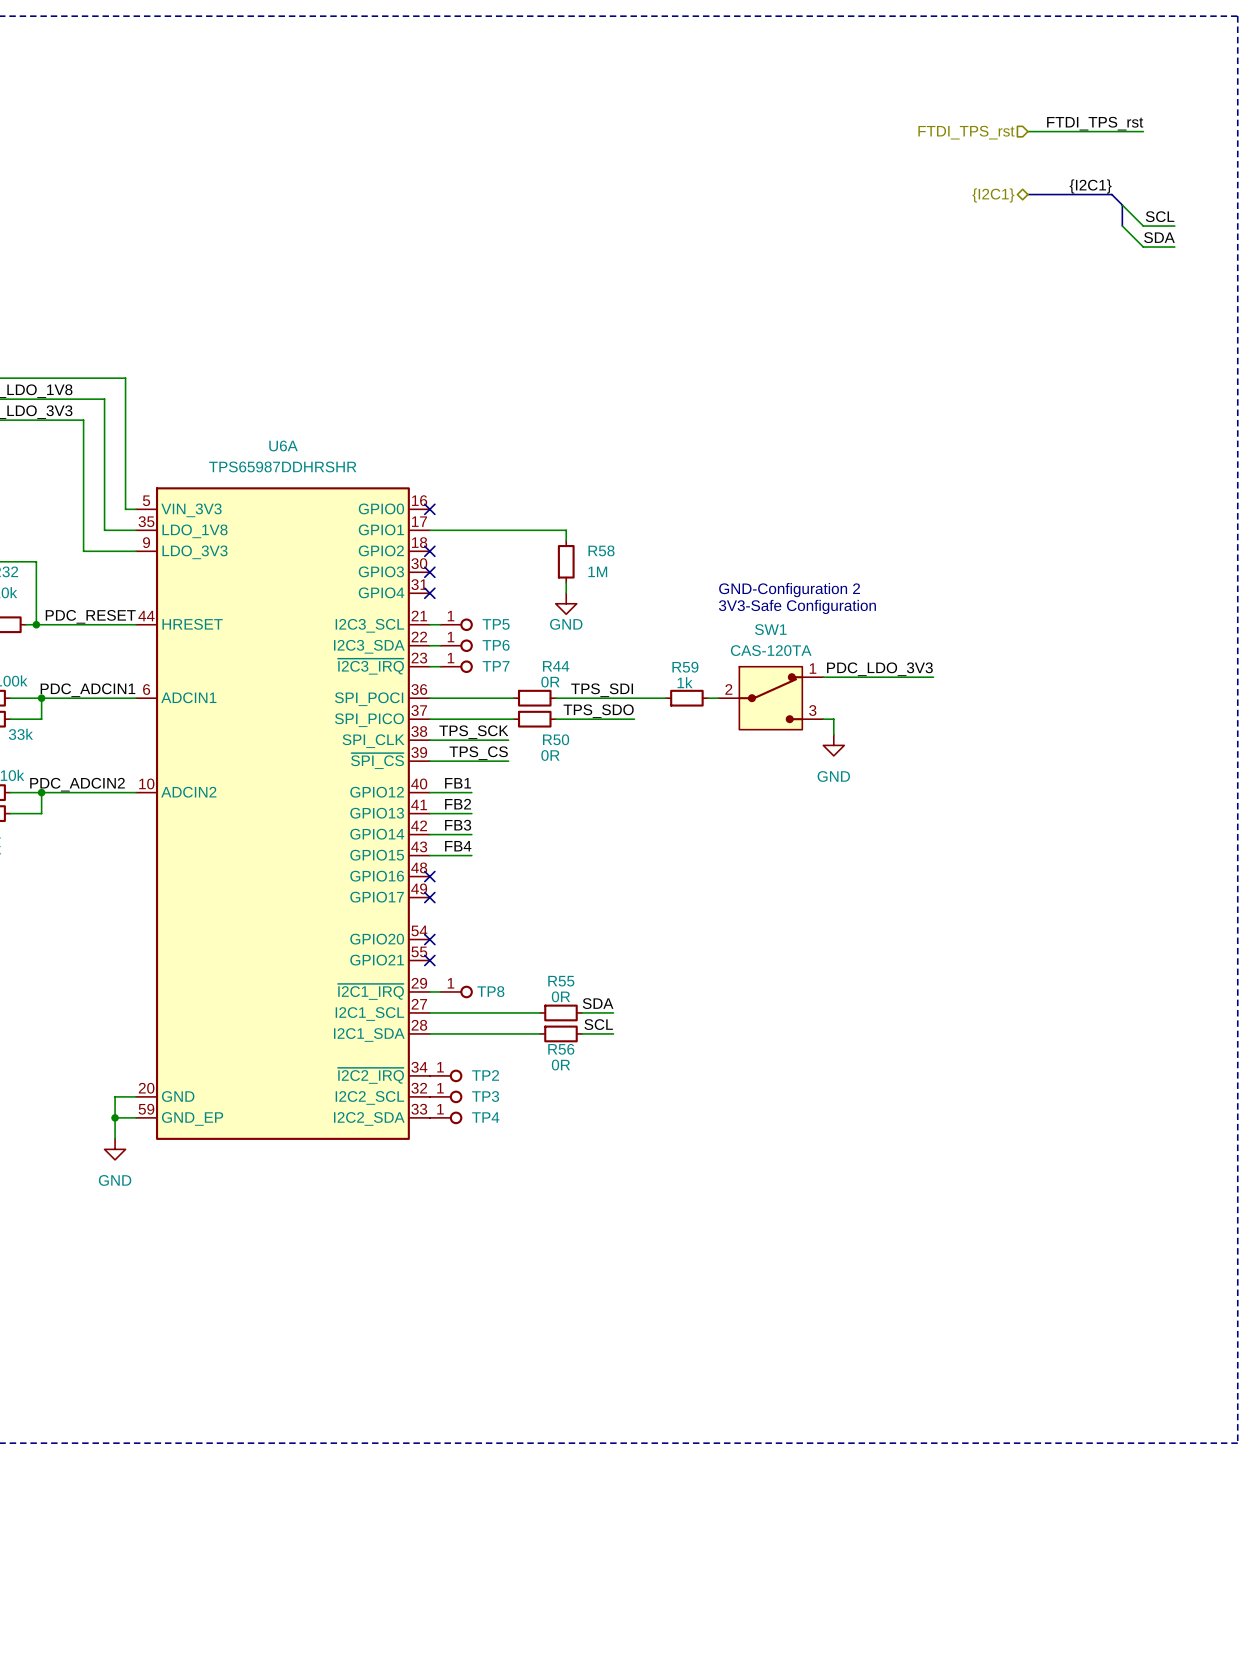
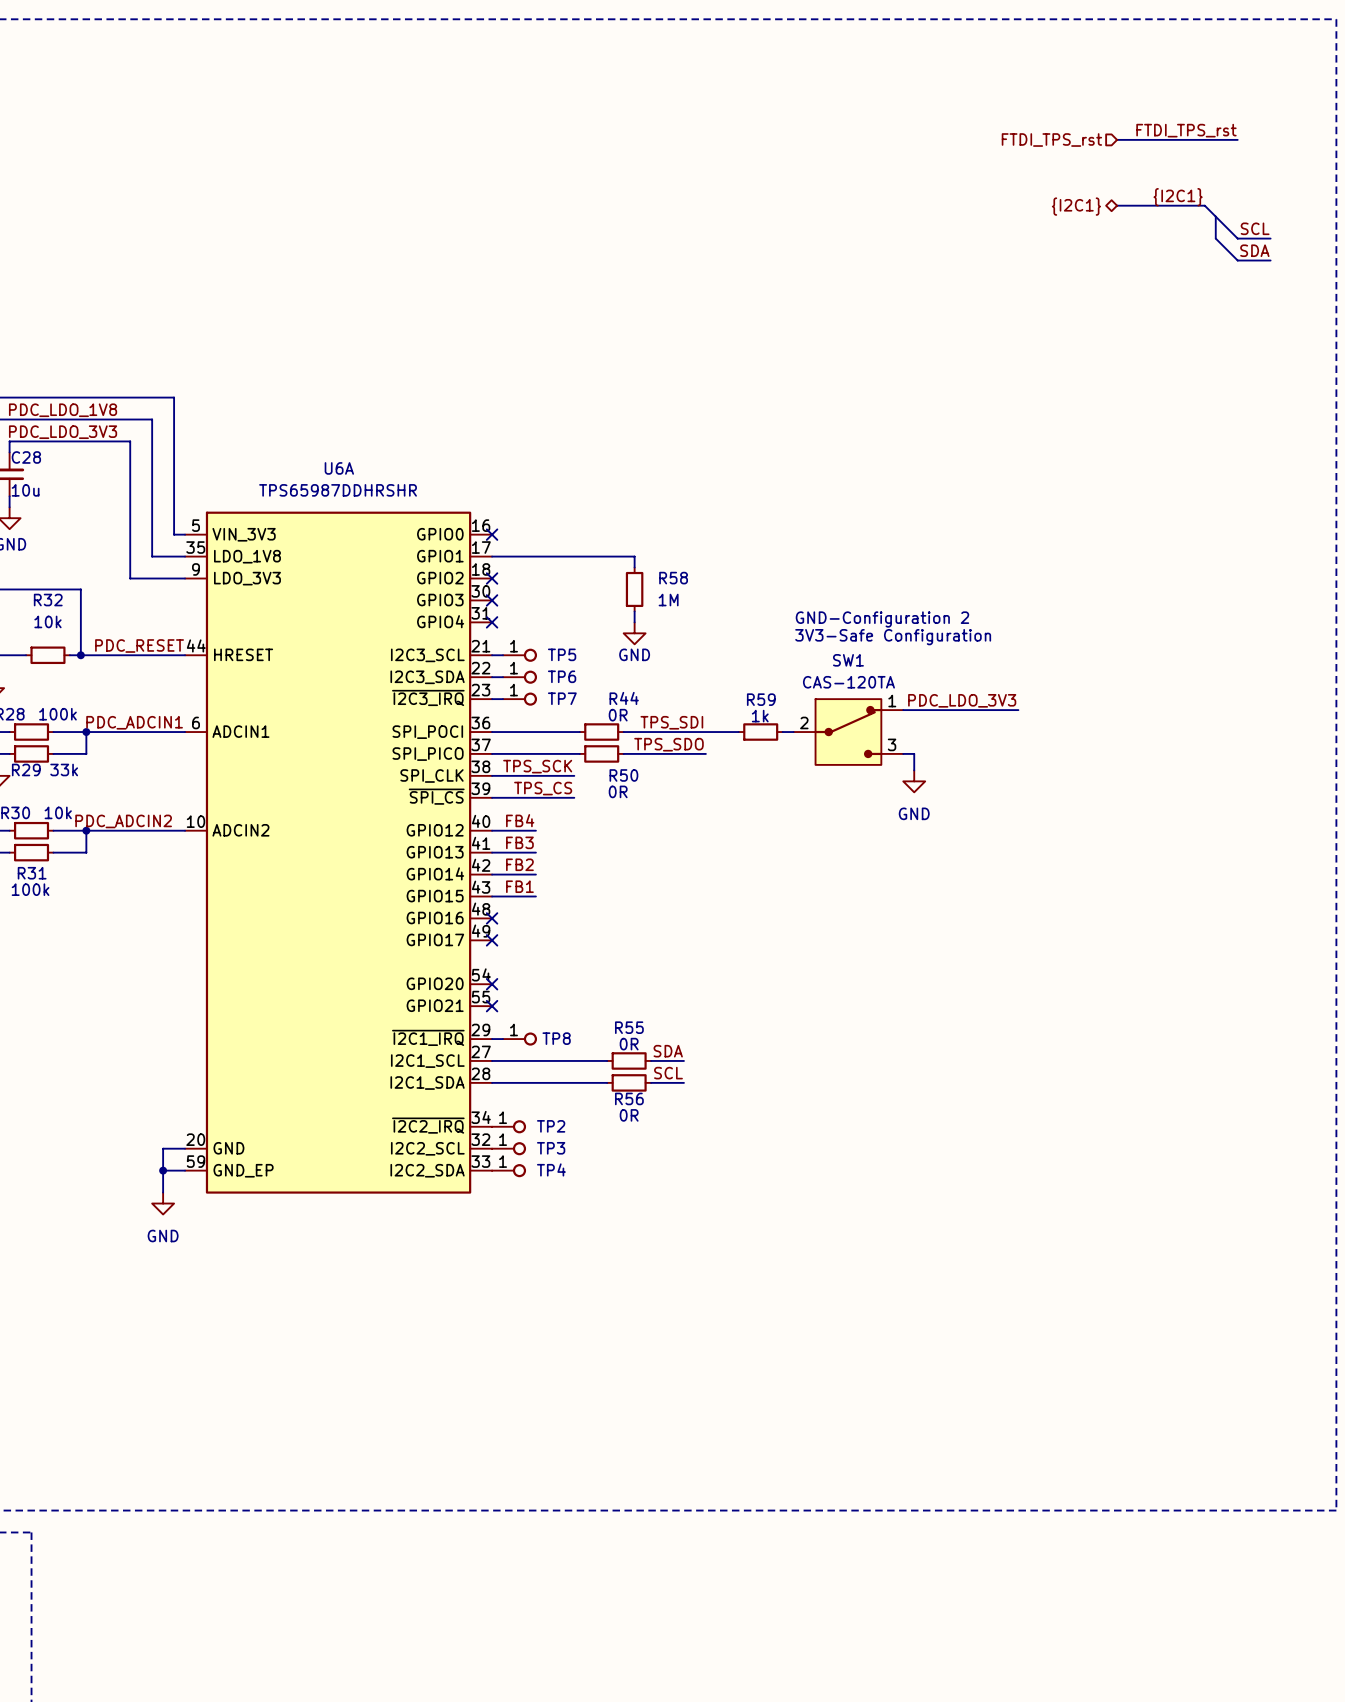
label: FB1 (458, 783) -> FB4 (520, 820)
label: FB2 (458, 804) -> FB3 (519, 842)
label: FB3 (458, 825) -> FB2 (519, 864)
label: FB4 (458, 846) -> FB1 (519, 886)

